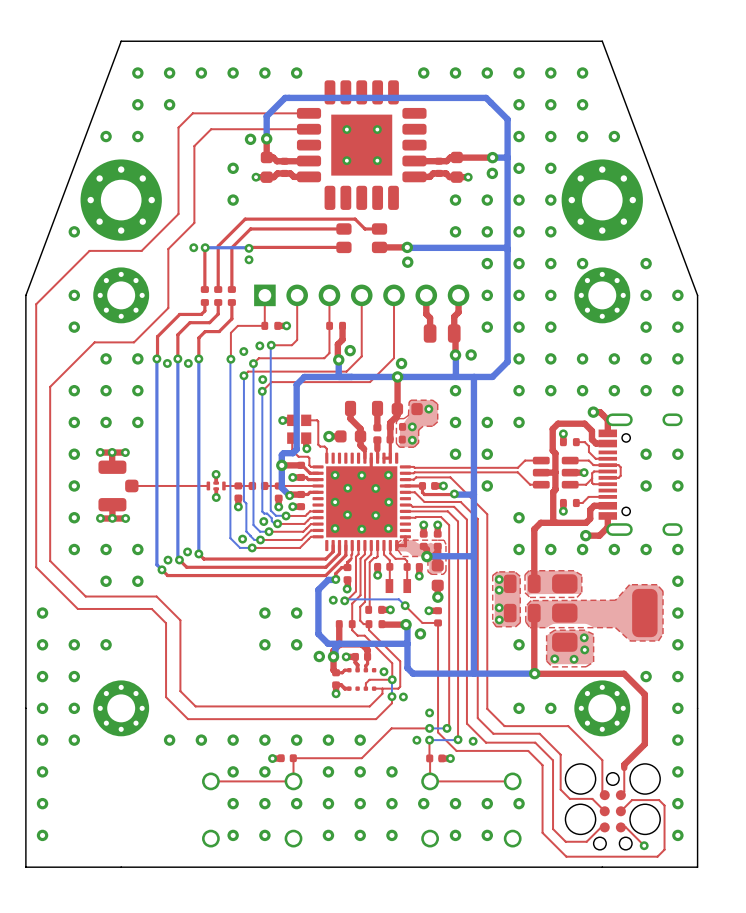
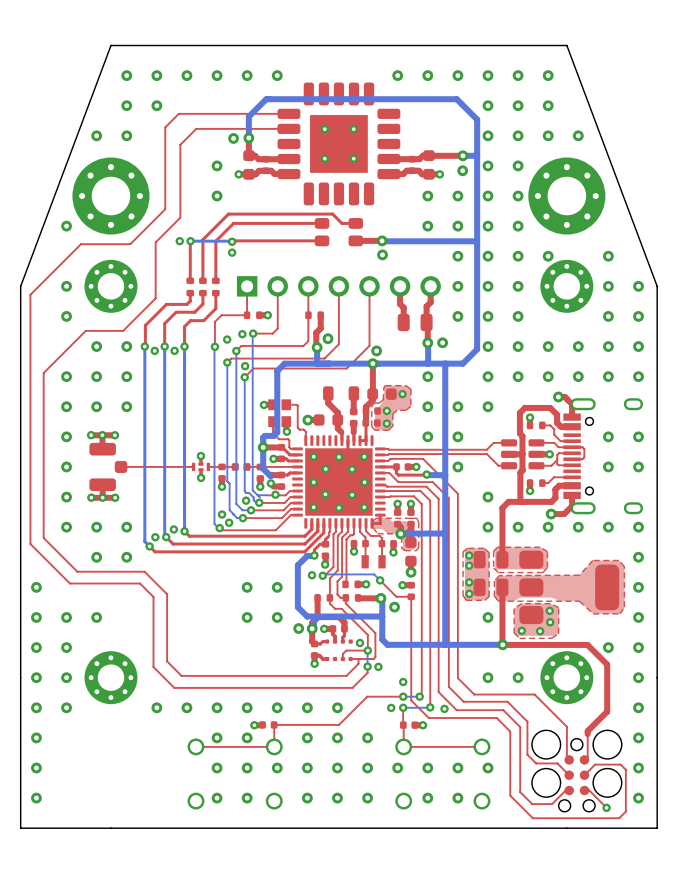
via: (289, 495) -> none
via: none -> (270, 483)
via: (292, 506) -> none
via: (286, 515) -> none
via: none -> (275, 494)
via: none -> (222, 514)
bottom track: (230, 538) (240, 547) (252, 547) -> (214, 516) (214, 523) (219, 528)
via: (242, 539) -> none
via: none -> (229, 522)
via: (252, 547) -> none
top track: (299, 547) (252, 547) -> (280, 525) (275, 530) (221, 530) (219, 528)
via: none -> (219, 528)

